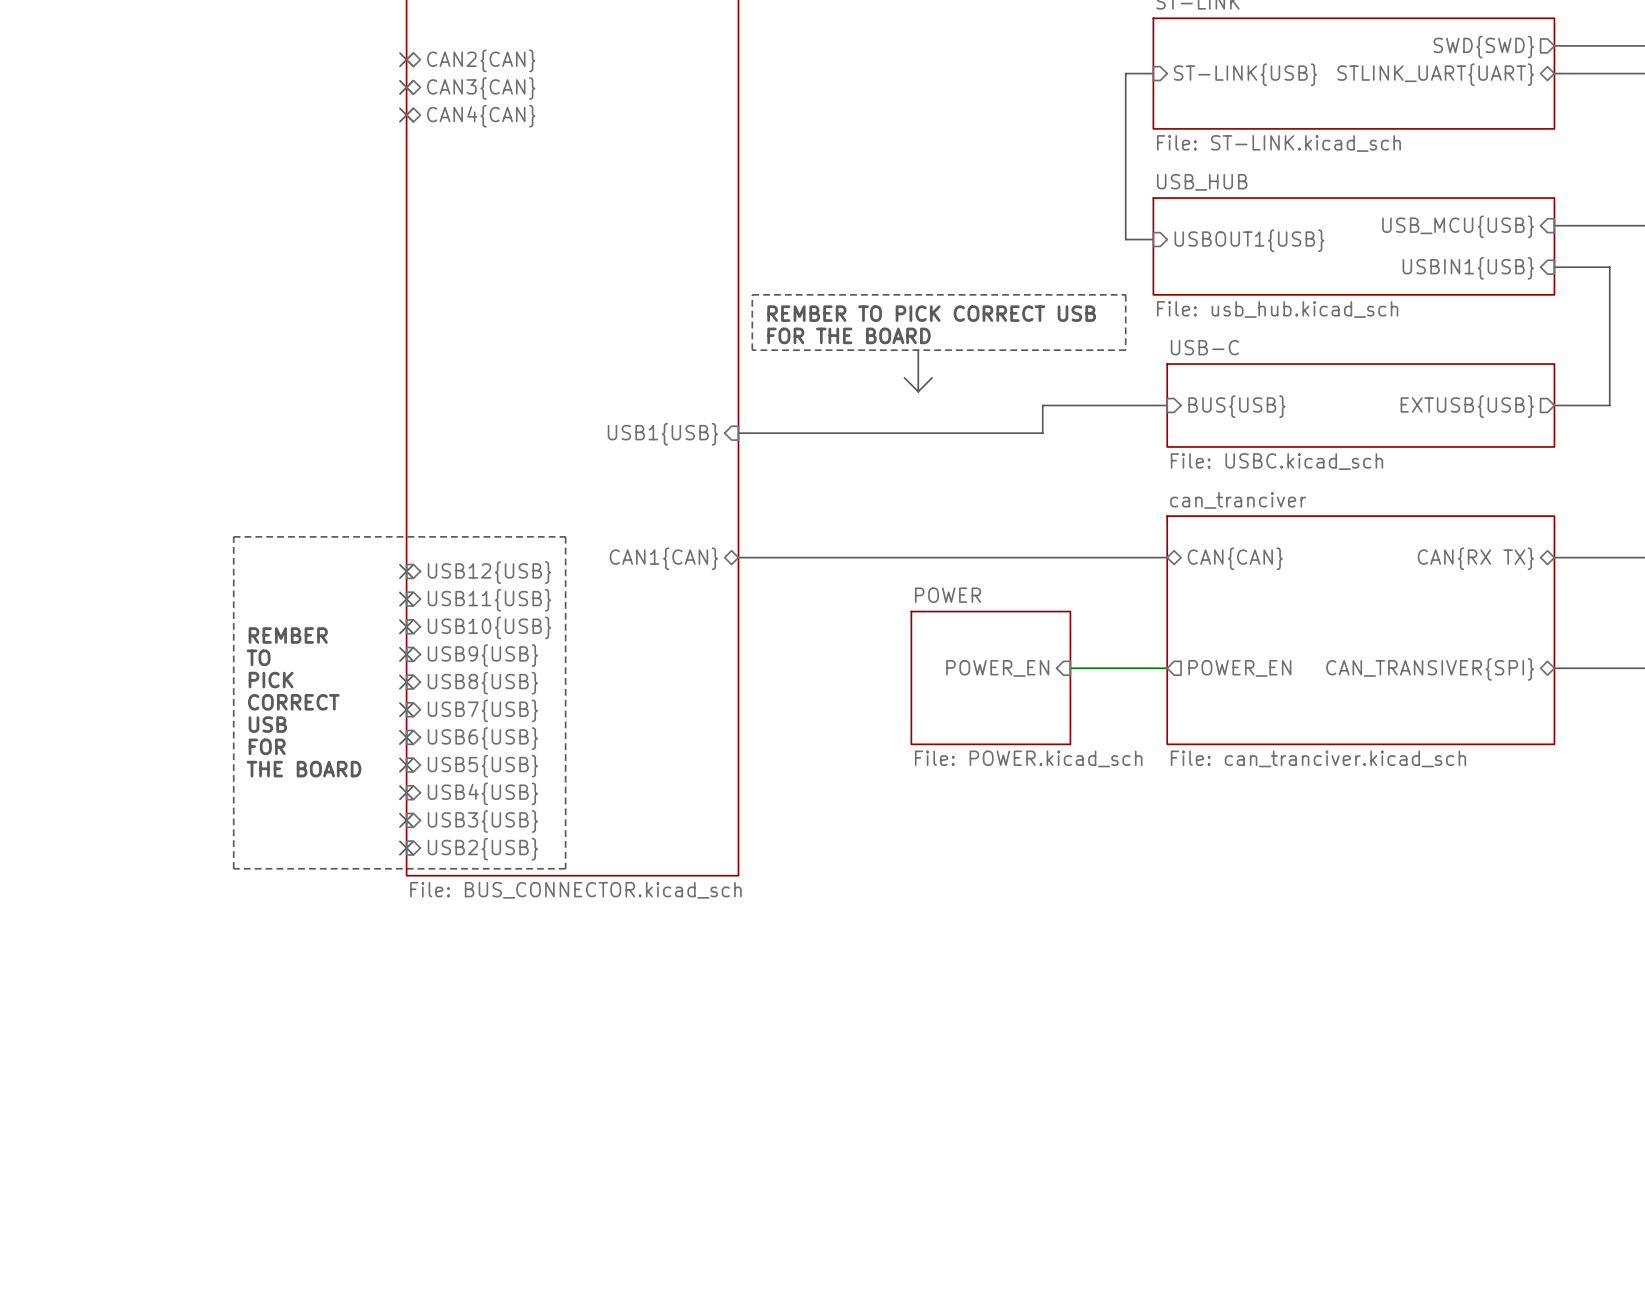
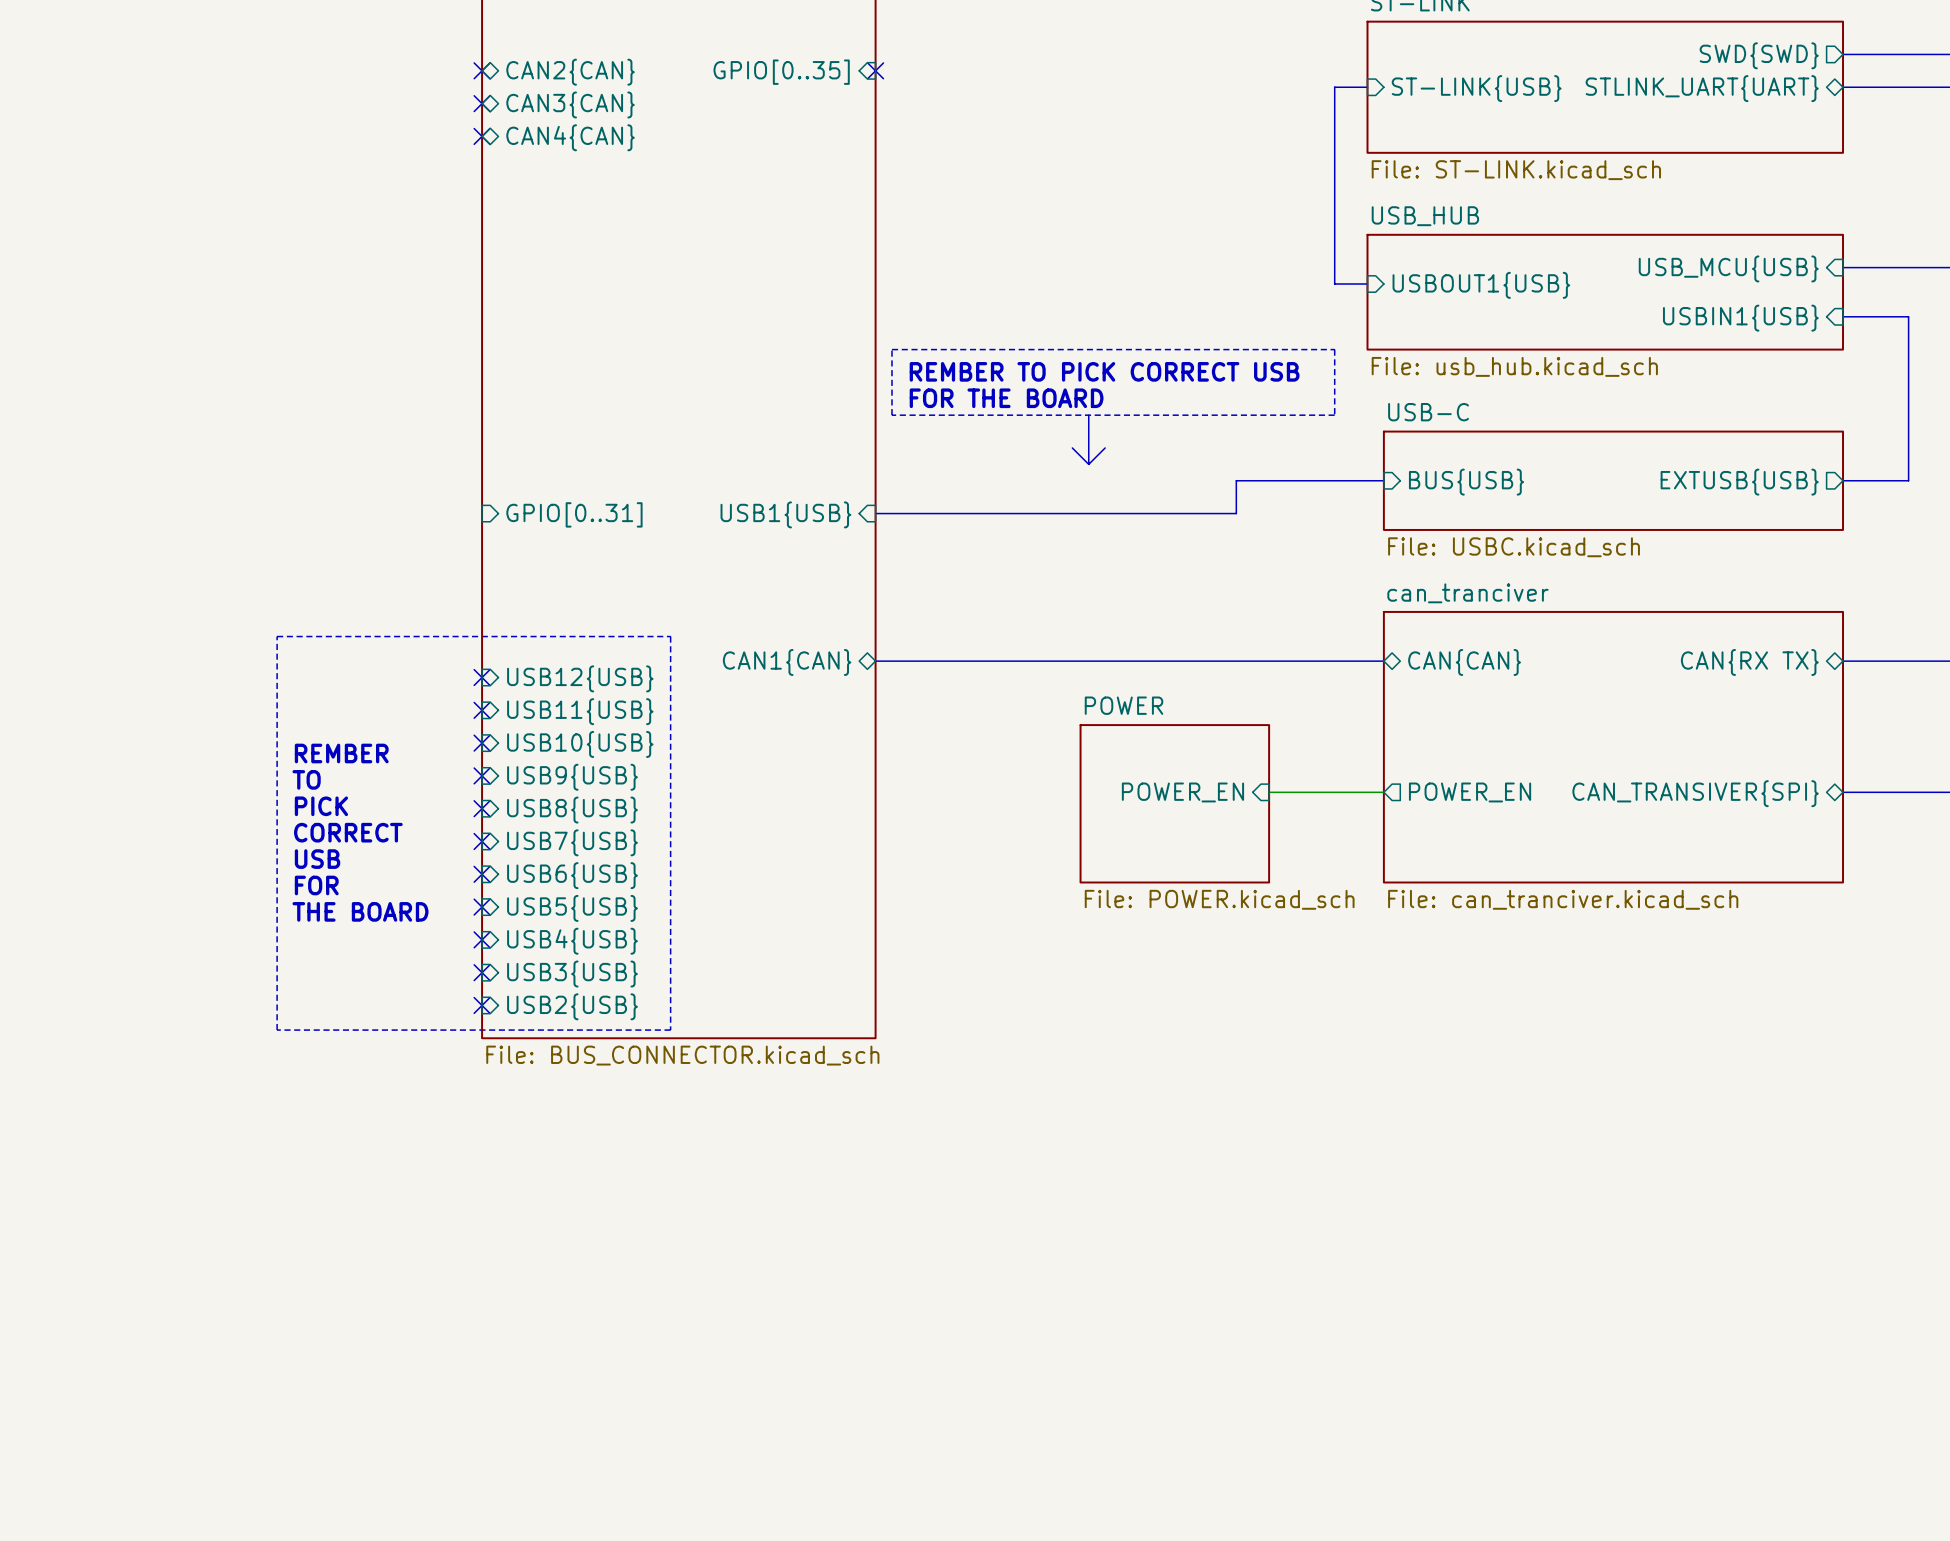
no-connect mark: none -> (875, 70)
sheet pin: none -> GPIO[0..35] (781, 72)
sheet pin: none -> GPIO[0..31] (574, 514)

